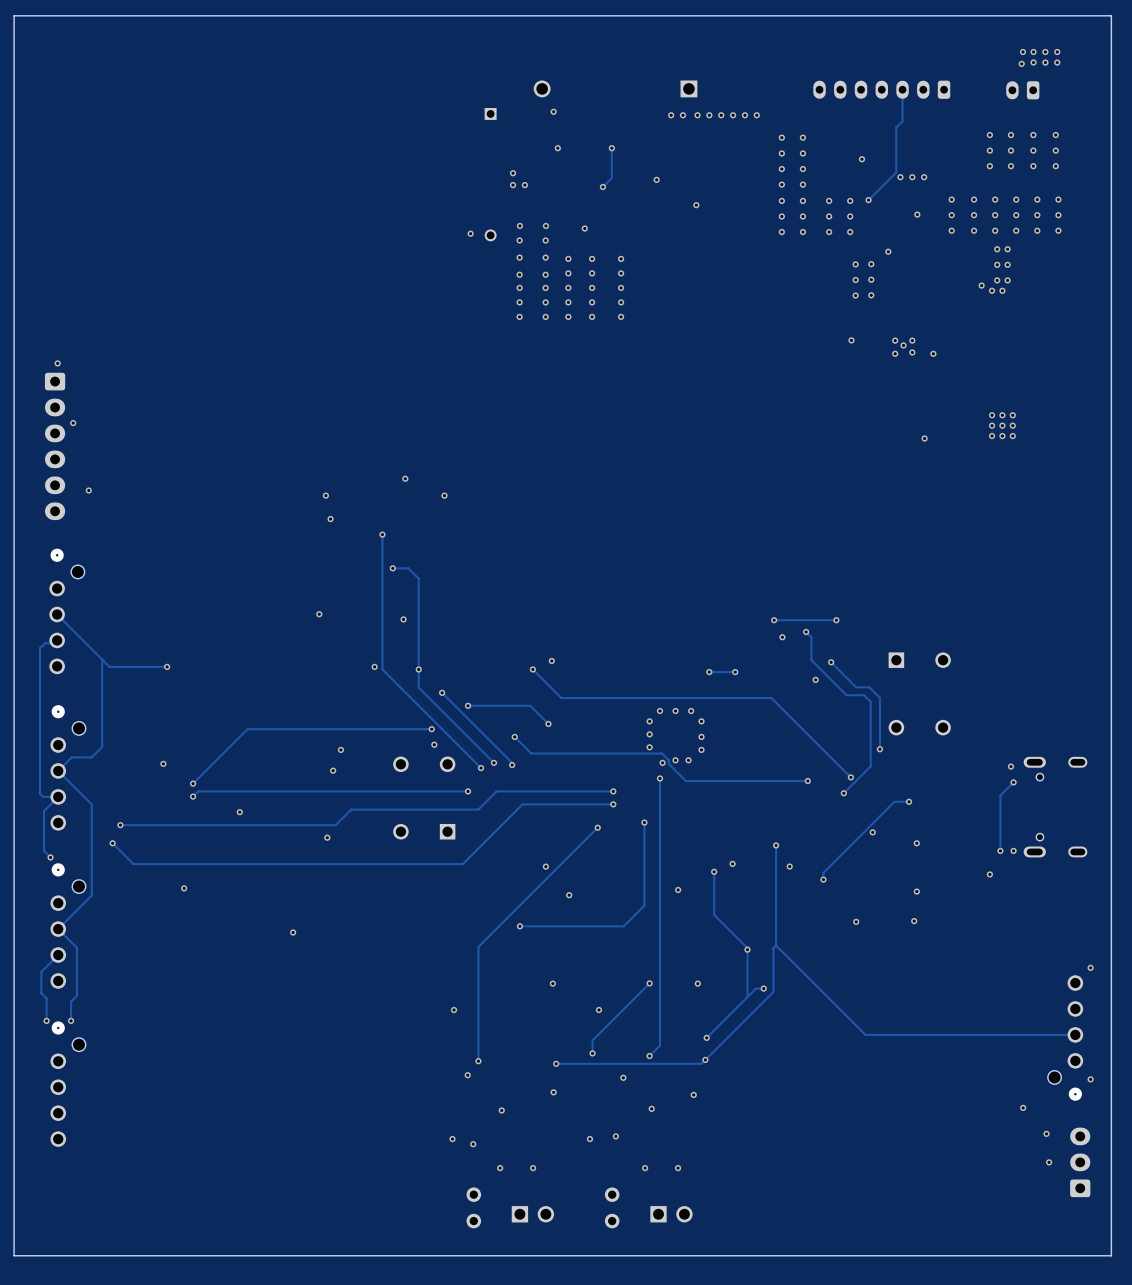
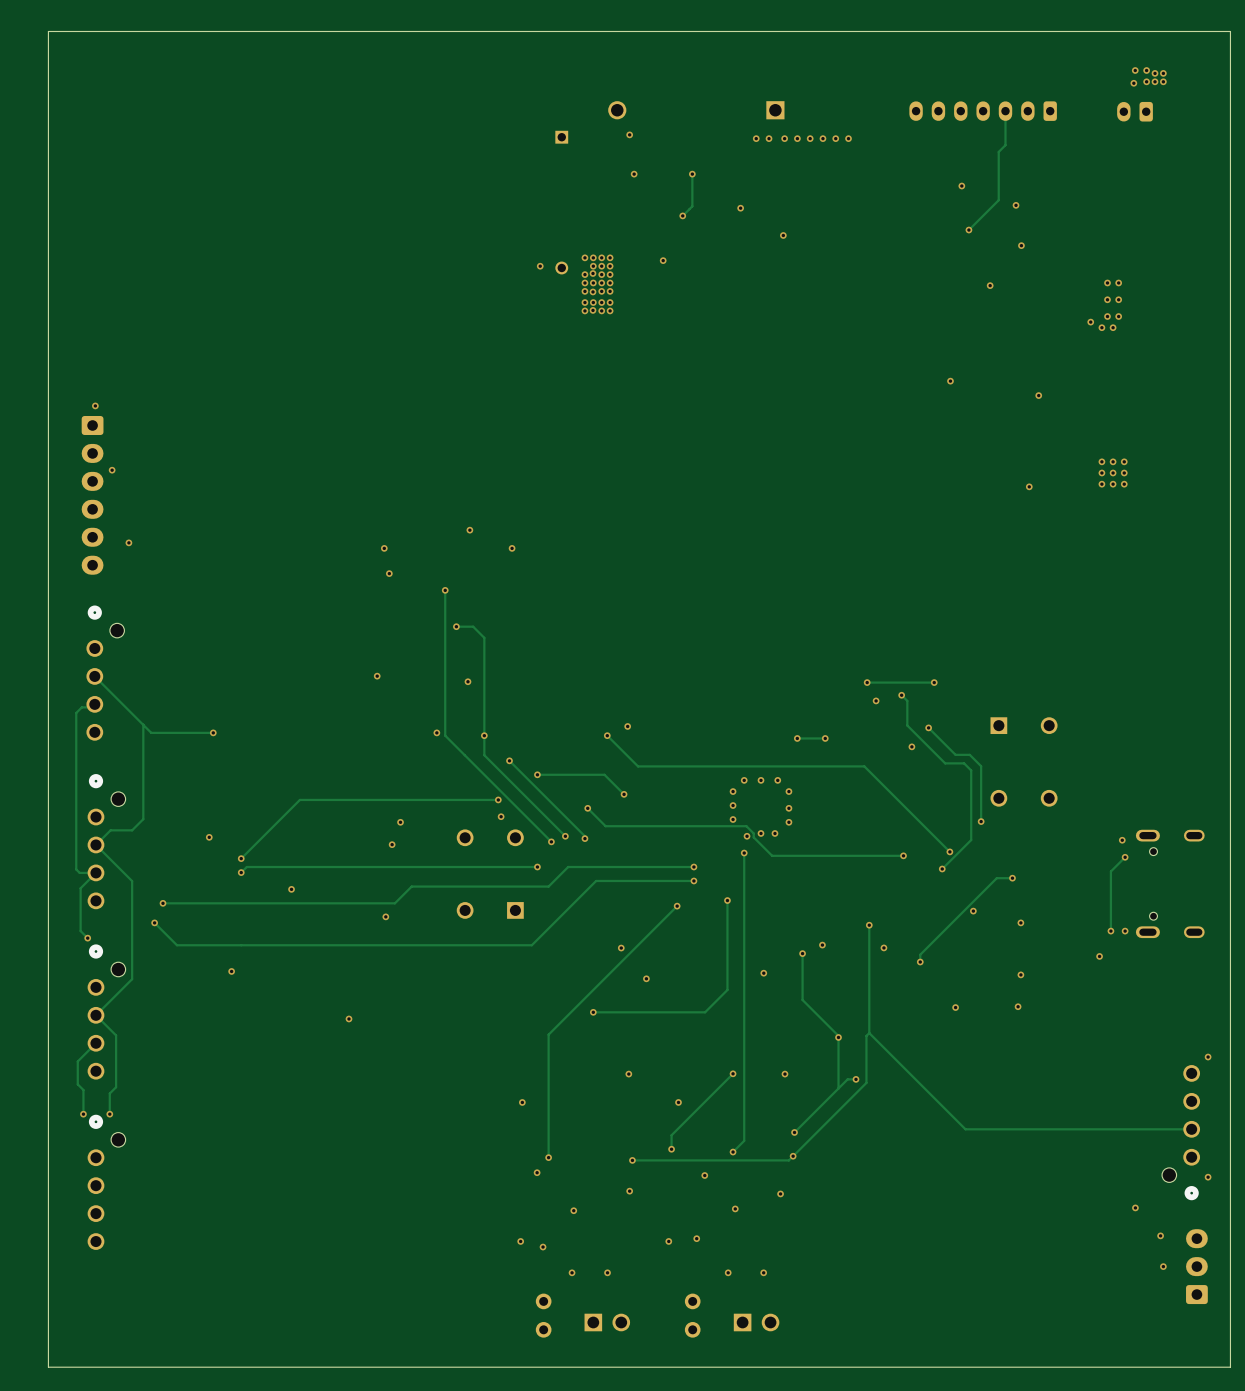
via: (1045, 52) -> none
via: (1057, 52) -> none
via: none -> (1155, 73)
via: none -> (1163, 73)
via: none -> (1155, 81)
via: (1045, 62) -> none
via: none -> (1163, 81)
via: (1057, 62) -> none
via: (989, 135) -> none
via: (1010, 135) -> none
via: (1033, 135) -> none
via: (1055, 135) -> none
via: (781, 137) -> none
via: (802, 137) -> none
via: (989, 150) -> none
via: (1010, 150) -> none
via: (1033, 150) -> none
via: (1055, 150) -> none
via: (781, 153) -> none
via: (802, 153) -> none
via: (989, 166) -> none
via: (1010, 166) -> none
via: (1033, 166) -> none
via: (1055, 166) -> none
via: (781, 169) -> none
via: (802, 169) -> none
via: (513, 173) -> none
via: (900, 177) -> none
via: (924, 177) -> none
via: (781, 184) -> none
via: (802, 184) -> none
via: (513, 185) -> none
via: (524, 185) -> none
via: (951, 199) -> none
via: (974, 199) -> none
via: (995, 199) -> none
via: (1016, 199) -> none
via: (1037, 199) -> none
via: (1058, 199) -> none
via: (781, 200) -> none
via: (802, 200) -> none
via: (829, 200) -> none
via: (850, 200) -> none
via: (951, 215) -> none
via: (974, 215) -> none
via: (995, 215) -> none
via: (1016, 215) -> none
via: (1037, 215) -> none
via: (1058, 215) -> none
via: (781, 216) -> none
via: (802, 216) -> none
via: (829, 216) -> none
via: (850, 216) -> none
via: none -> (584, 257)
via: none -> (601, 257)
via: none -> (610, 257)
via: (545, 225) -> none
via: (951, 230) -> none
via: (974, 230) -> none
via: (995, 230) -> none
via: (1016, 230) -> none
via: (1037, 230) -> none
via: (1058, 230) -> none
via: (781, 232) -> none
via: (802, 232) -> none
via: (829, 232) -> none
via: (850, 232) -> none
via: none -> (593, 266)
via: none -> (601, 266)
via: none -> (610, 266)
via: (545, 240) -> none
via: none -> (584, 274)
via: none -> (601, 274)
via: none -> (610, 274)
via: none -> (584, 282)
via: none -> (593, 282)
via: none -> (601, 282)
via: none -> (610, 282)
via: none -> (584, 291)
via: none -> (601, 291)
via: none -> (610, 291)
via: (545, 257) -> none
via: (568, 258) -> none
via: (592, 258) -> none
via: (621, 258) -> none
via: (855, 264) -> none
via: (871, 264) -> none
via: none -> (584, 302)
via: none -> (593, 302)
via: none -> (601, 302)
via: none -> (610, 302)
via: (568, 273) -> none
via: (592, 273) -> none
via: (621, 273) -> none
via: (545, 274) -> none
via: none -> (584, 310)
via: none -> (601, 310)
via: none -> (610, 310)
via: (855, 279) -> none
via: (871, 279) -> none
via: (519, 287) -> none
via: (545, 287) -> none
via: (568, 287) -> none
via: (592, 287) -> none
via: (621, 287) -> none
via: (855, 295) -> none
via: (871, 295) -> none
via: (519, 302) -> none
via: (545, 302) -> none
via: (568, 302) -> none
via: (592, 302) -> none
via: (621, 302) -> none
via: (519, 316) -> none
via: (545, 316) -> none
via: (568, 316) -> none
via: (592, 316) -> none
via: (621, 316) -> none
via: (895, 340) -> none
via: (912, 340) -> none
via: (903, 345) -> none
via: (912, 352) -> none
via: (895, 353) -> none

